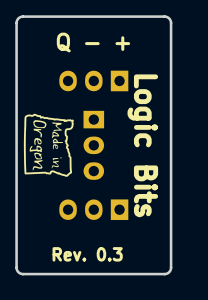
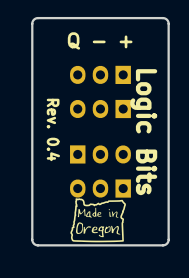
drawing: [23, 113, 74, 177] -> none
part: none -> (100, 109)
text: none -> Rev. 0.4 (53, 129)
part: (93, 145) -> none
part: none -> (100, 154)
drawing: none -> [70, 198, 126, 243]
text: Rev. 0.3 (87, 254) -> none

